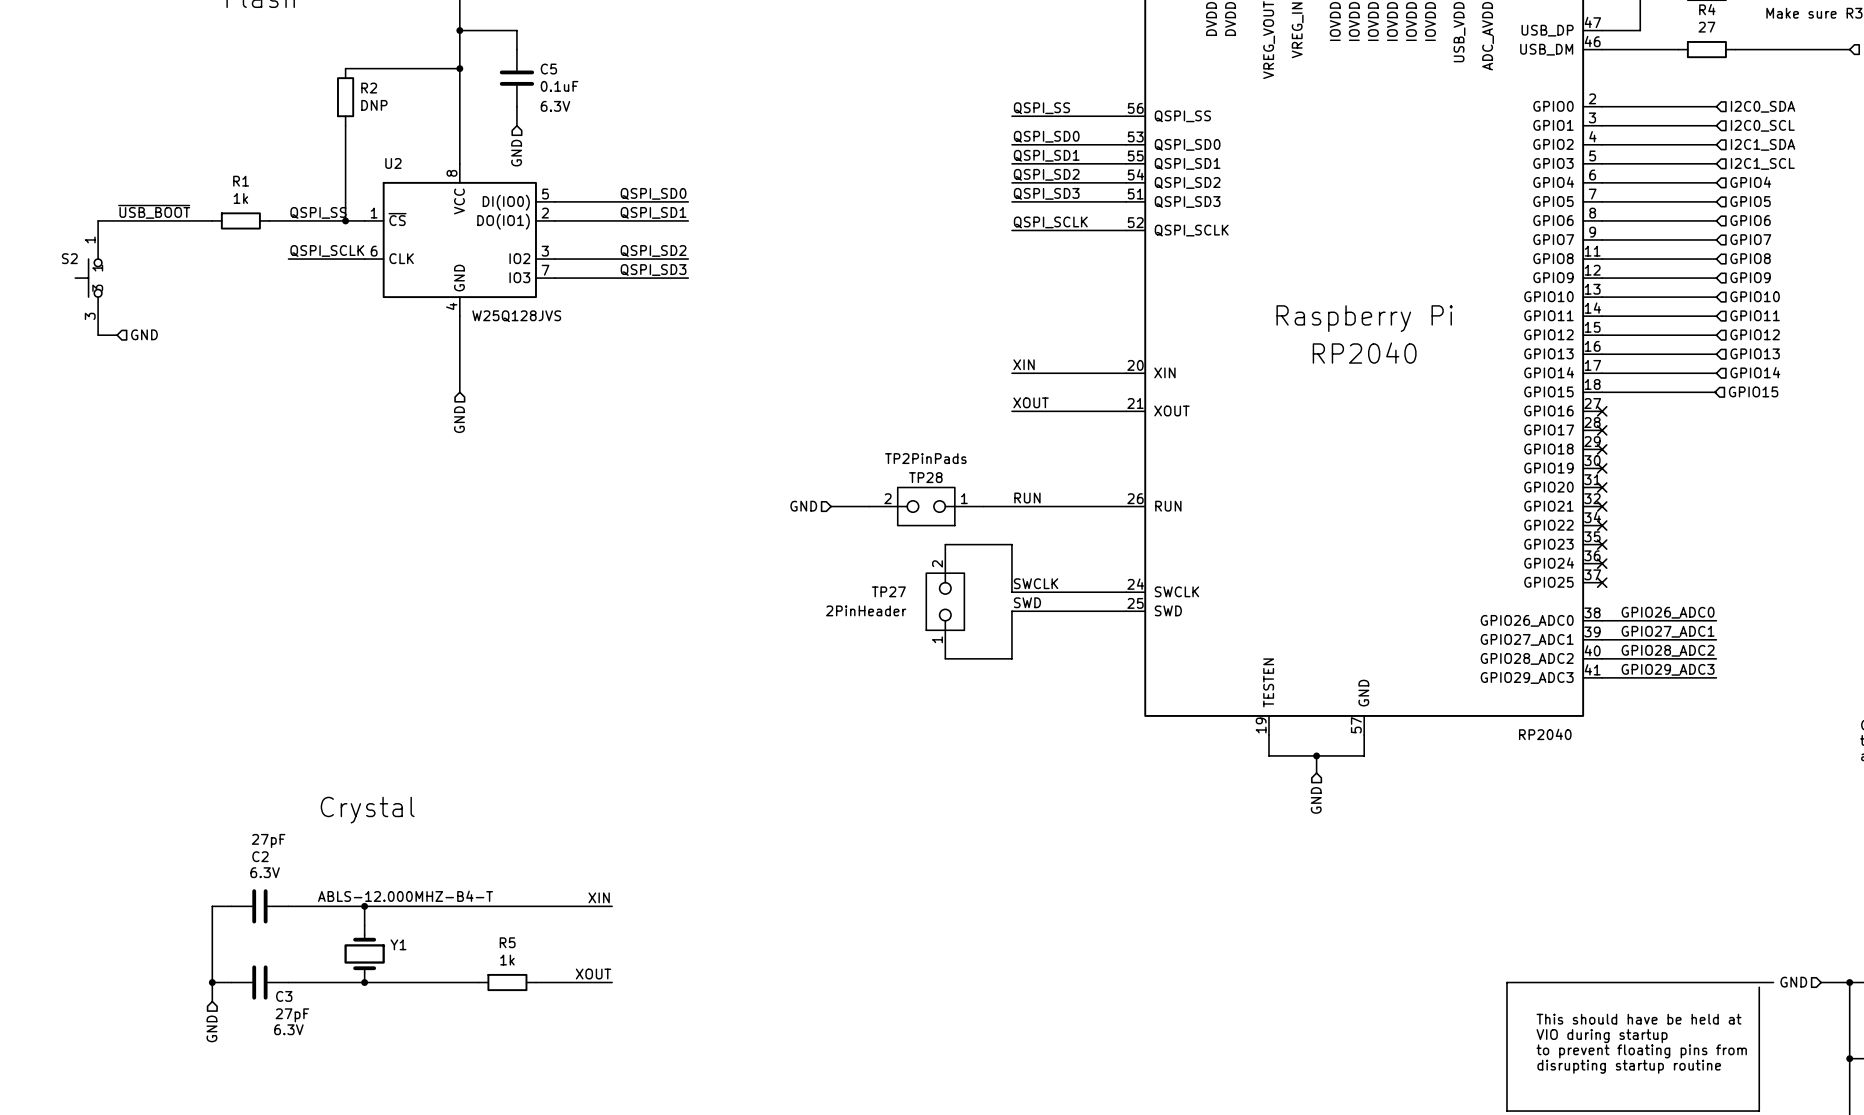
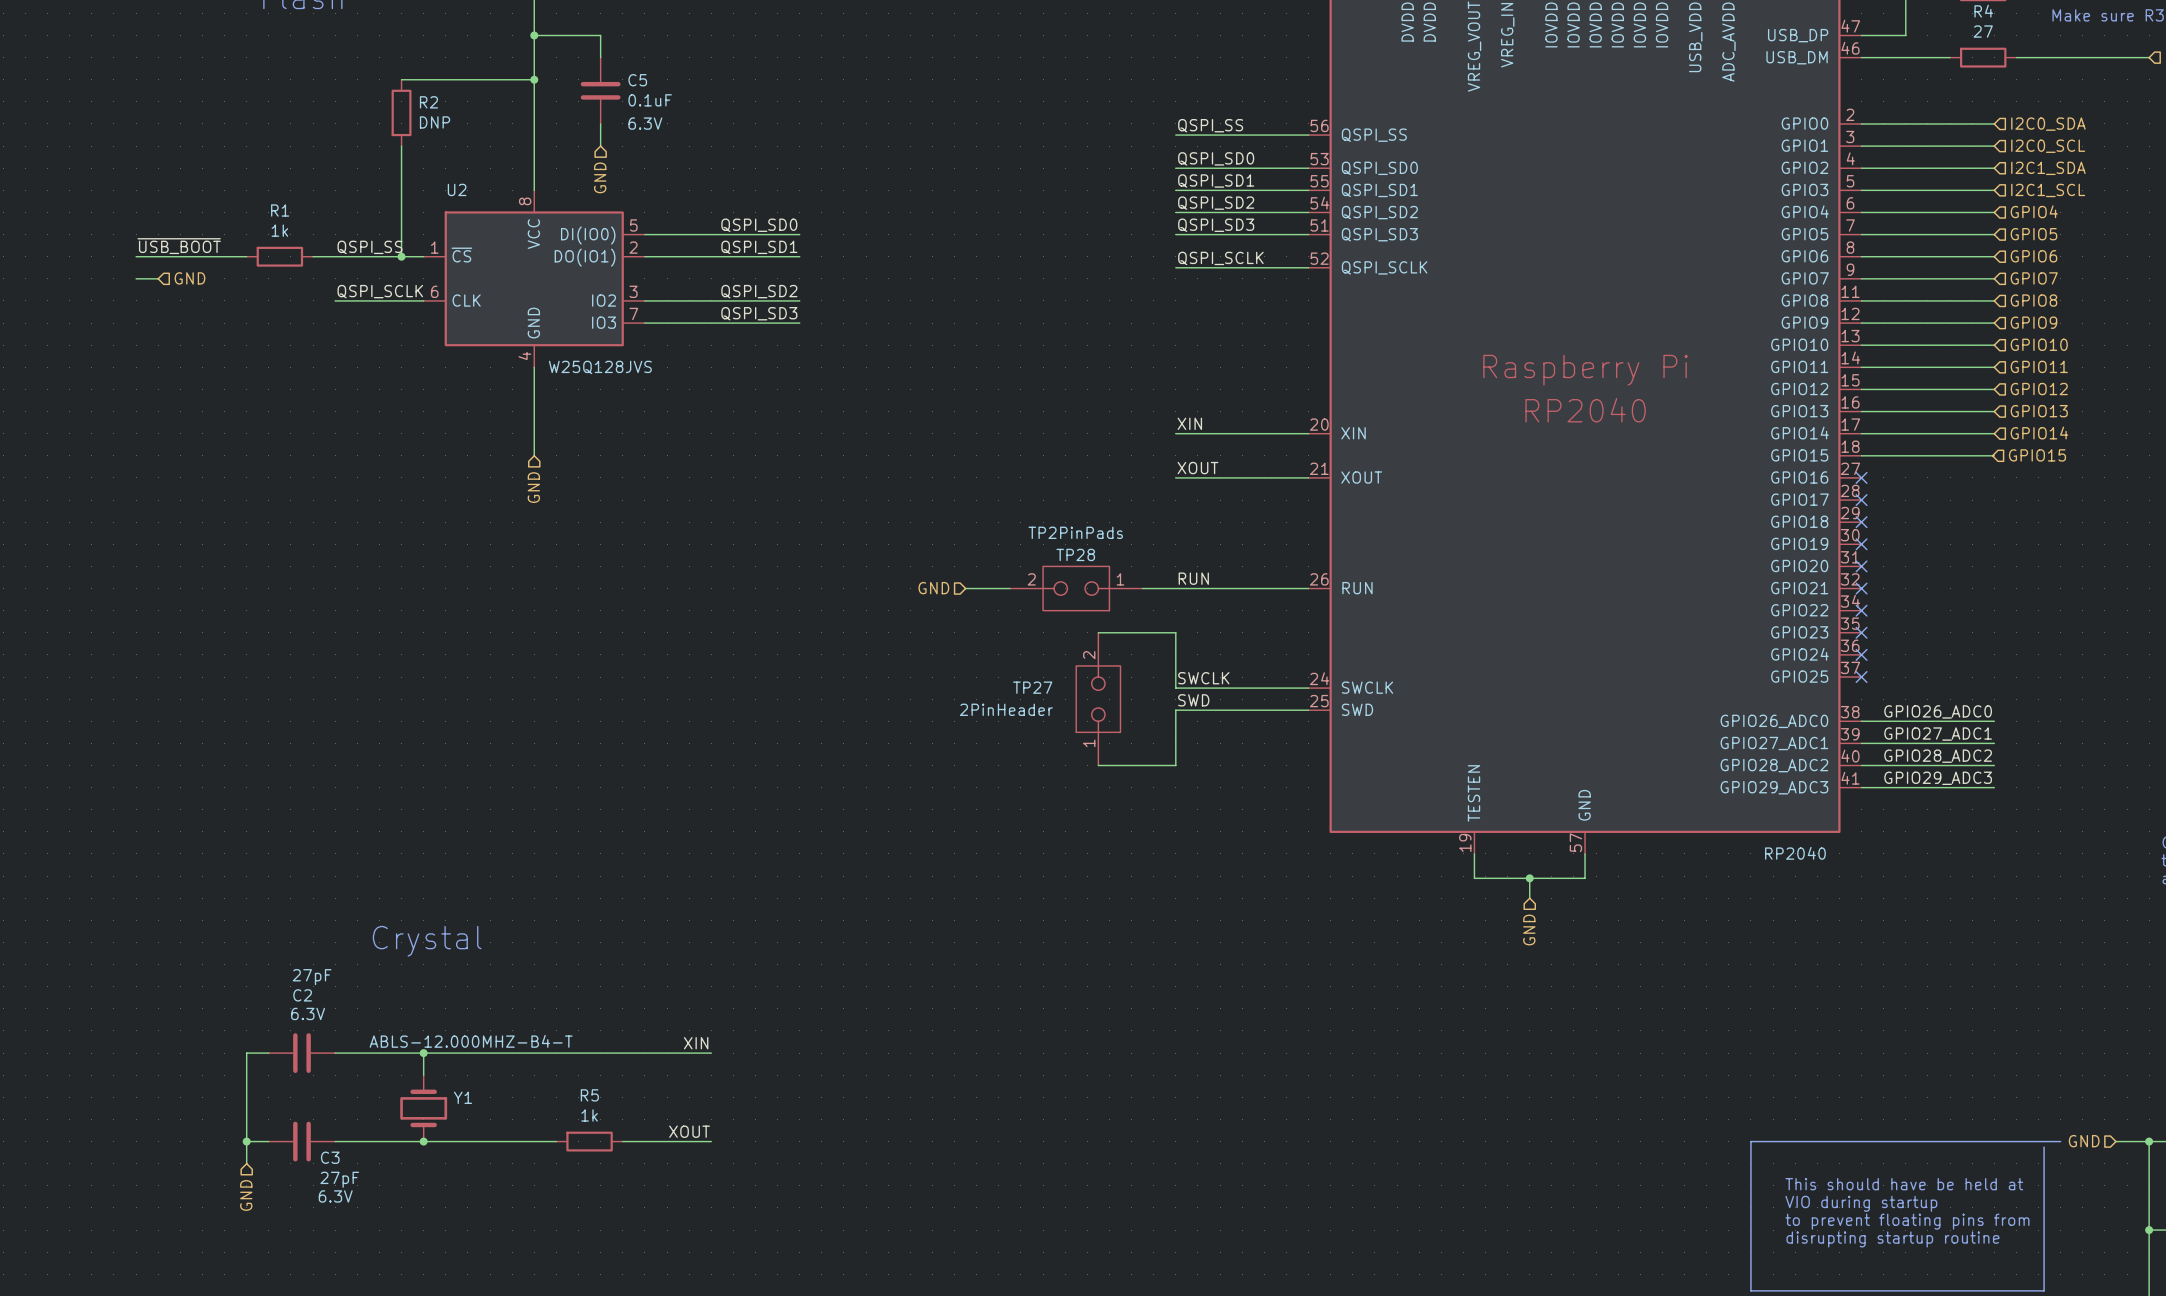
wire: (98, 220) (117, 220) -> (136, 278) (158, 278)
S2: (88, 278) -> none
hierarchical label position: GND (144, 334) -> GND (189, 278)
wire: (98, 335) (117, 335) -> none

